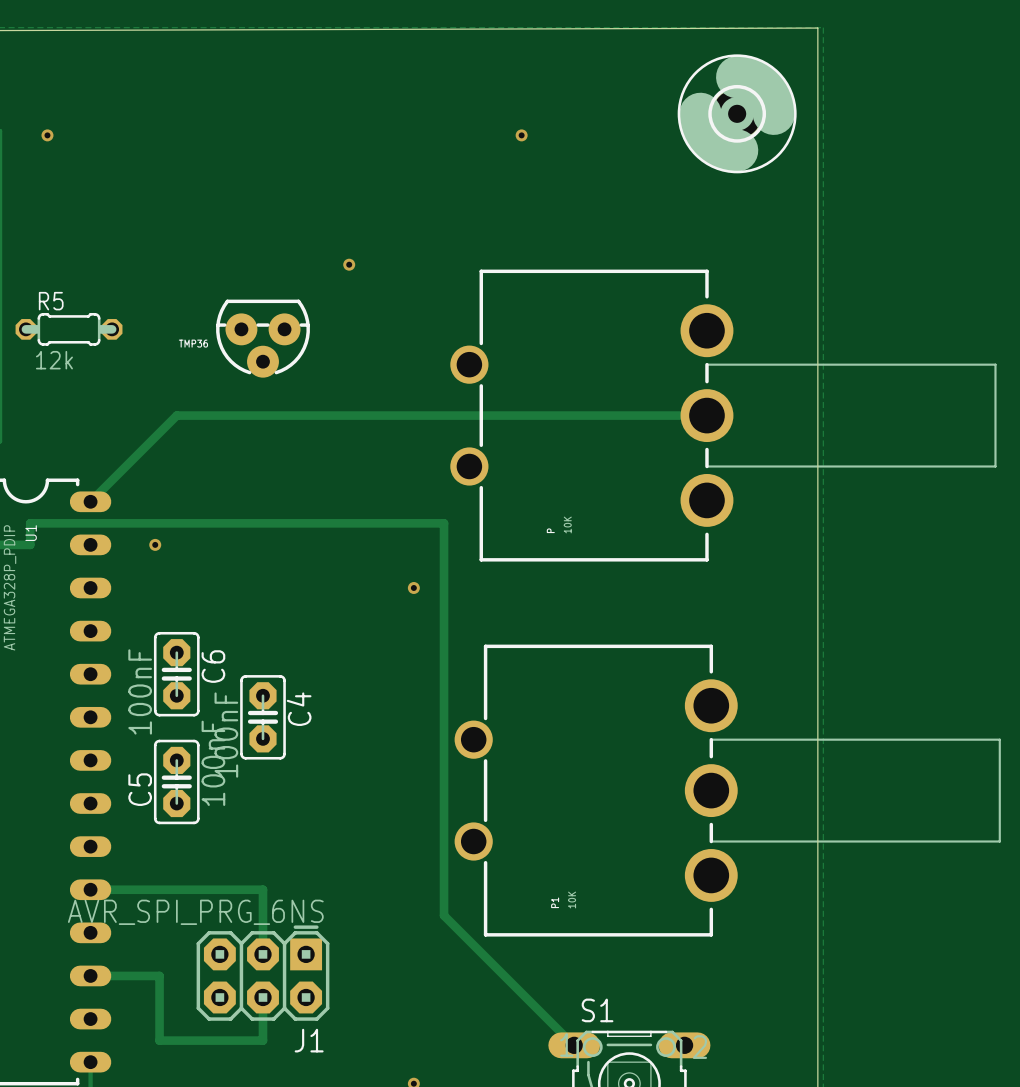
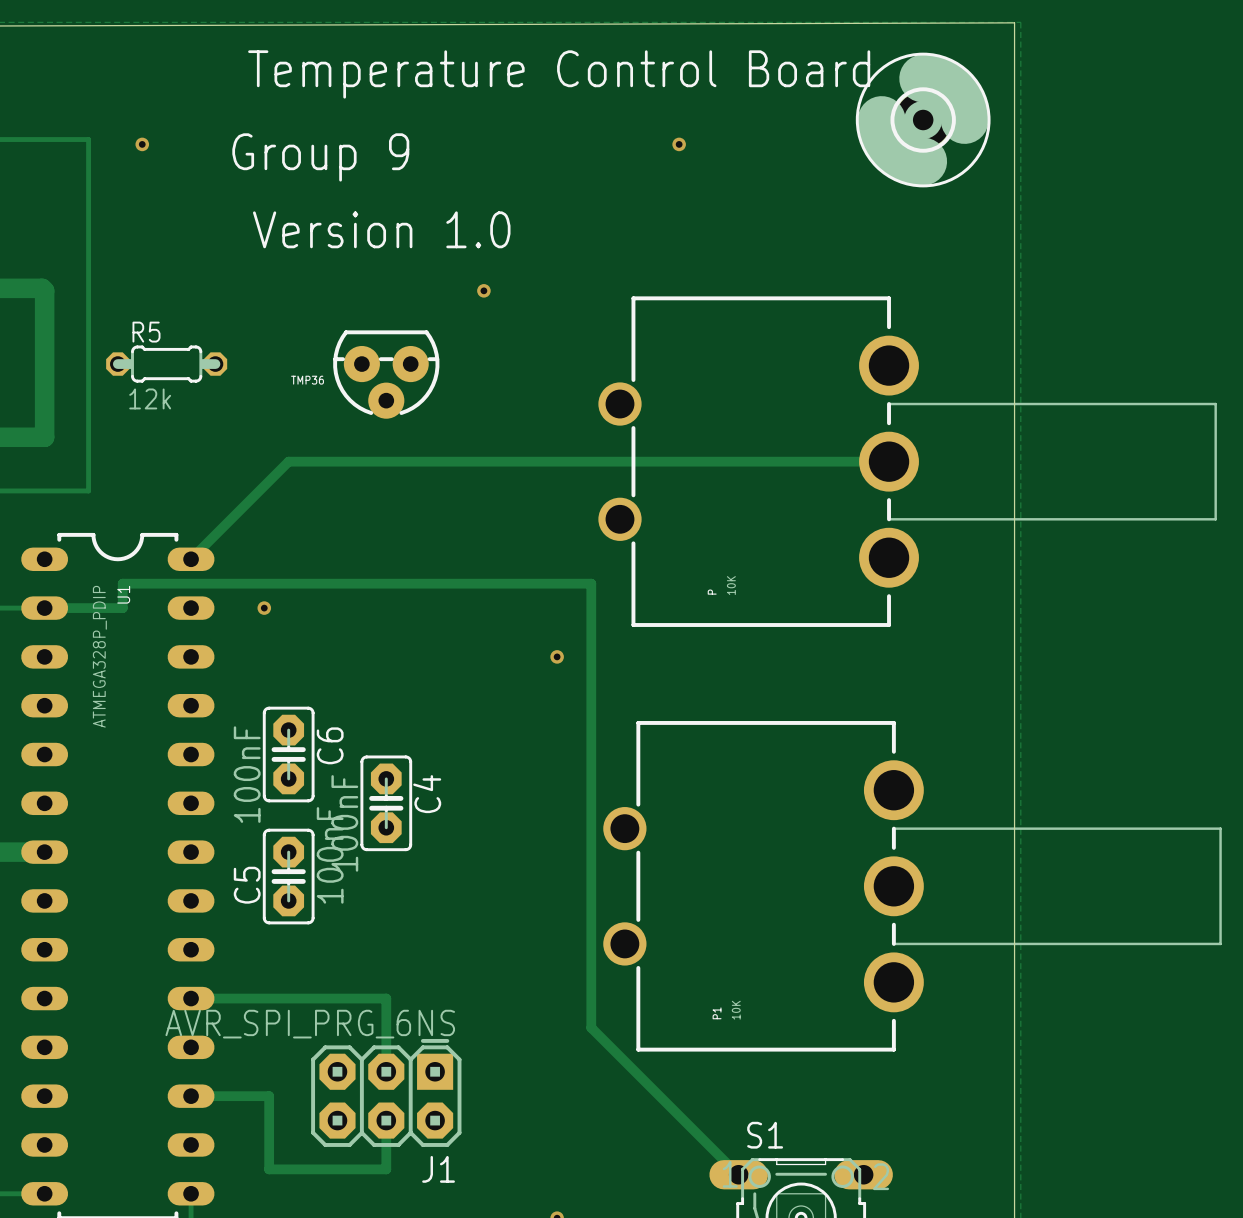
text: none -> Temperature Control Board (559, 74)
text: none -> Group 9 (320, 157)
text: none -> Version 1.0 (381, 229)

